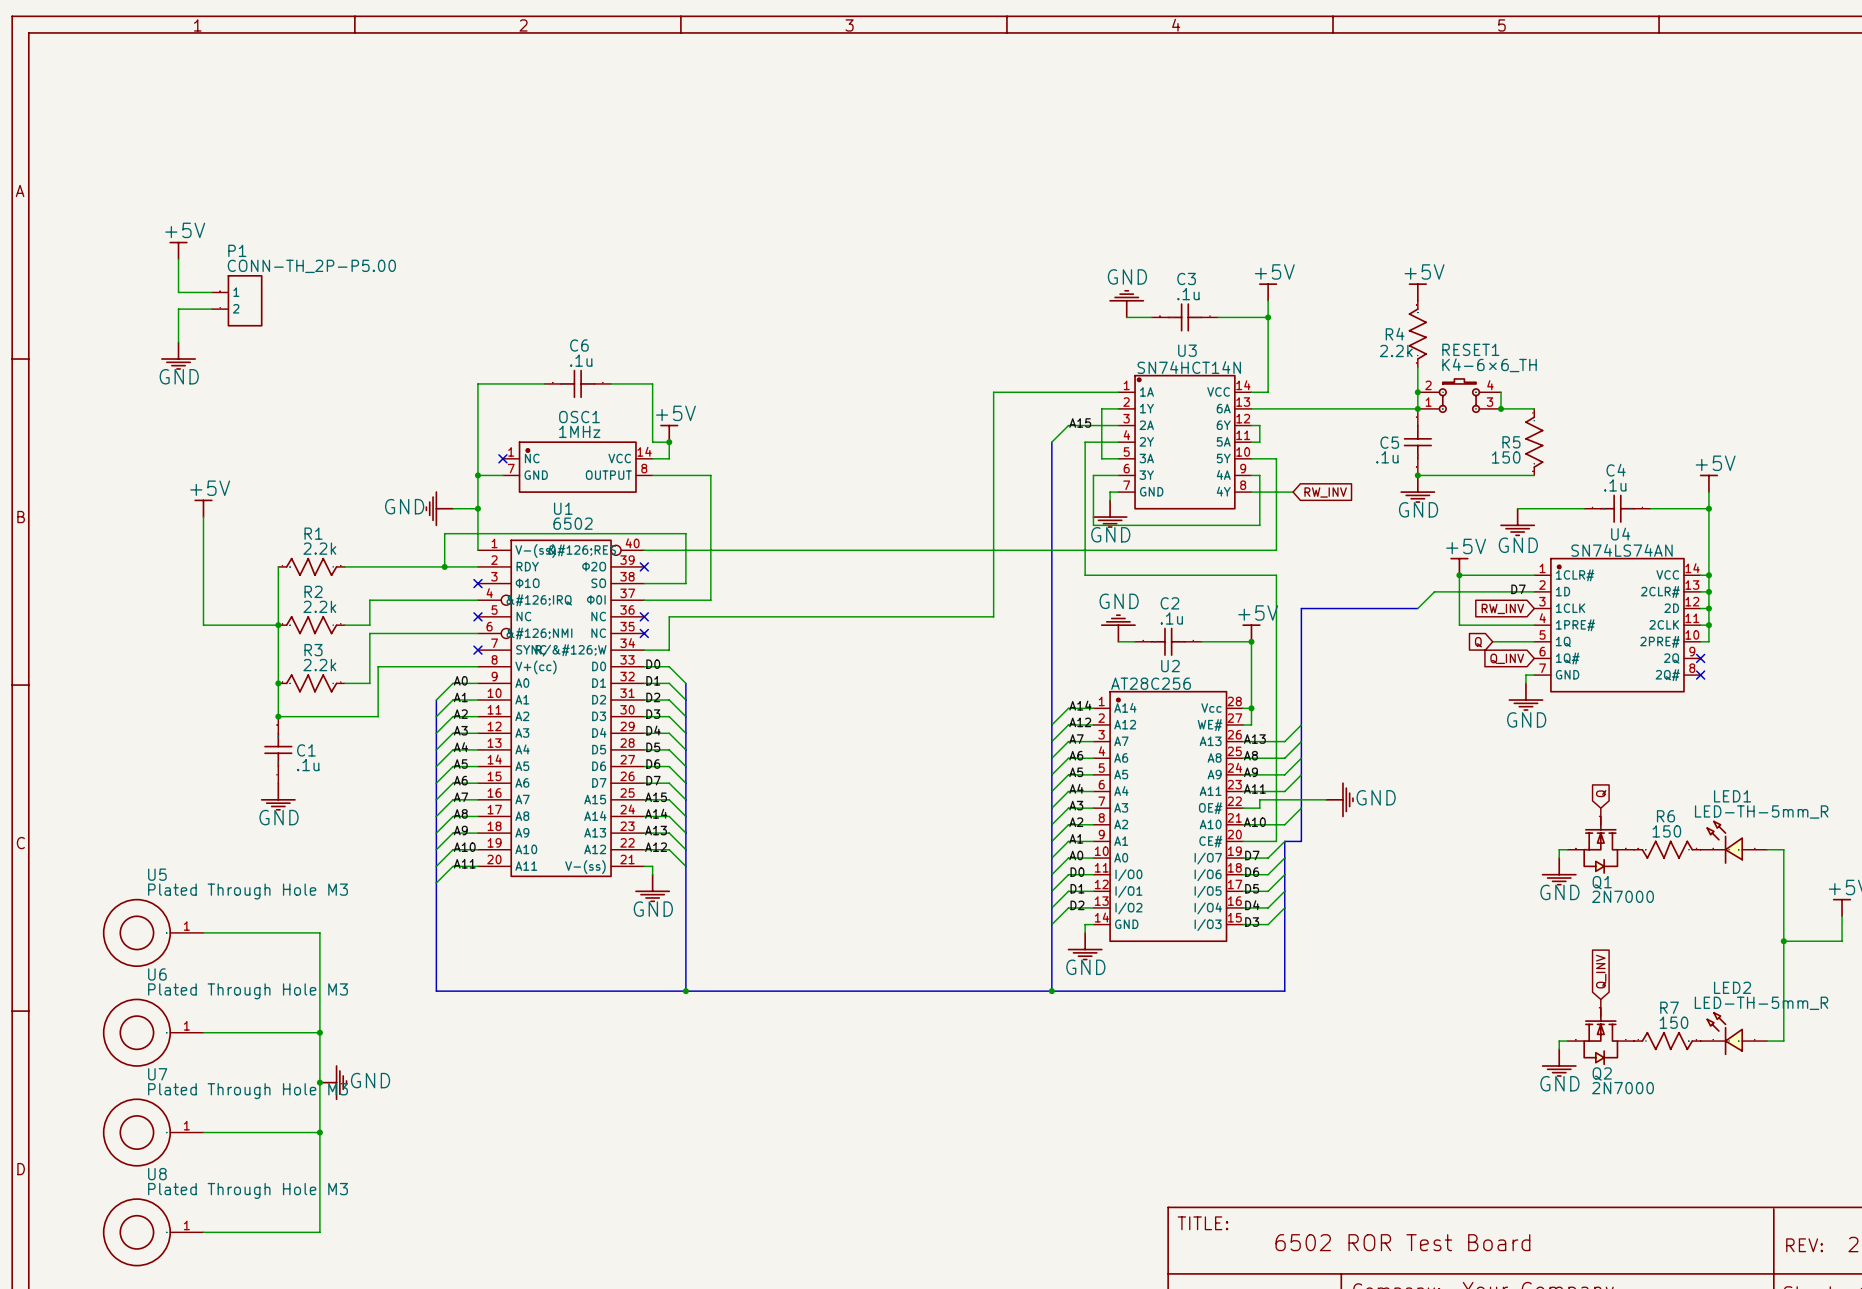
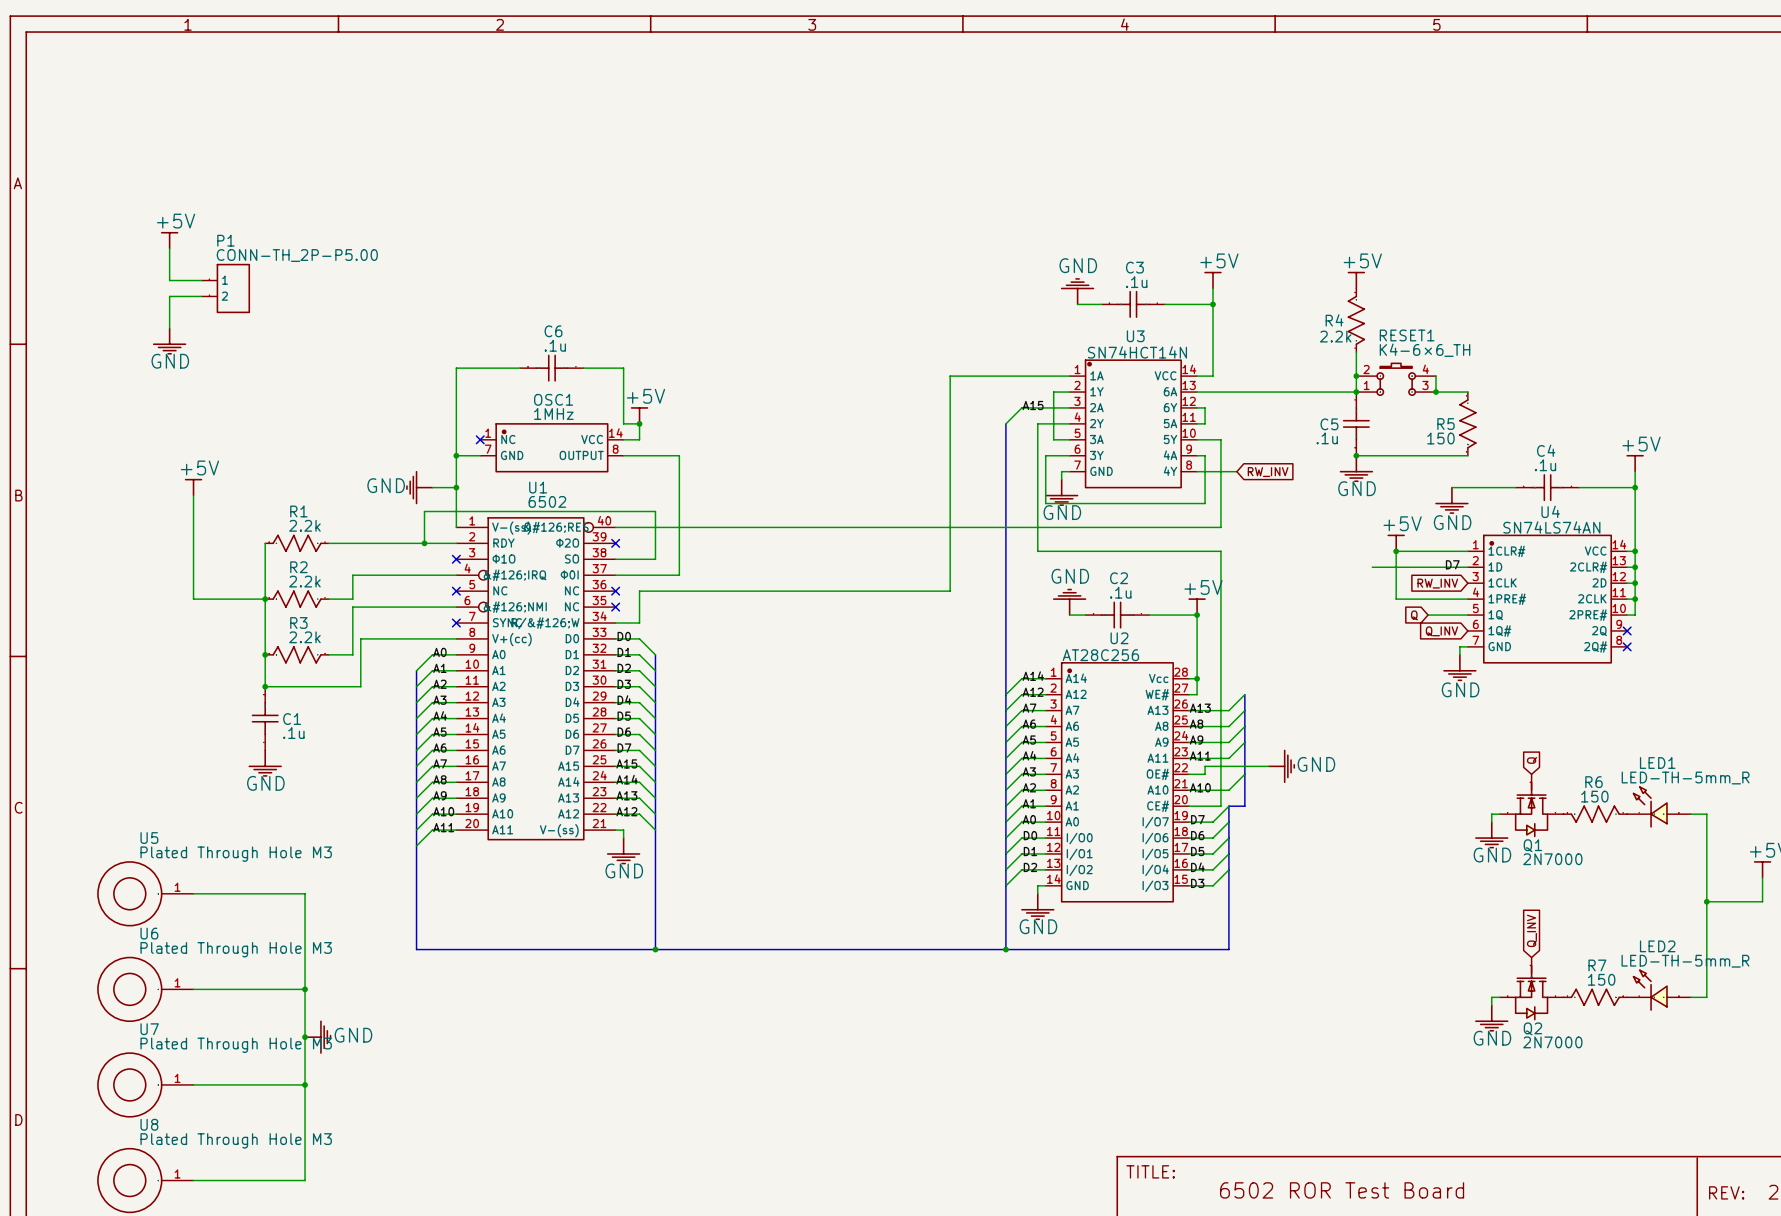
wire: (1434, 591) (1417, 608) -> none
bus: (1417, 608) (1301, 608) (1301, 724) -> none

